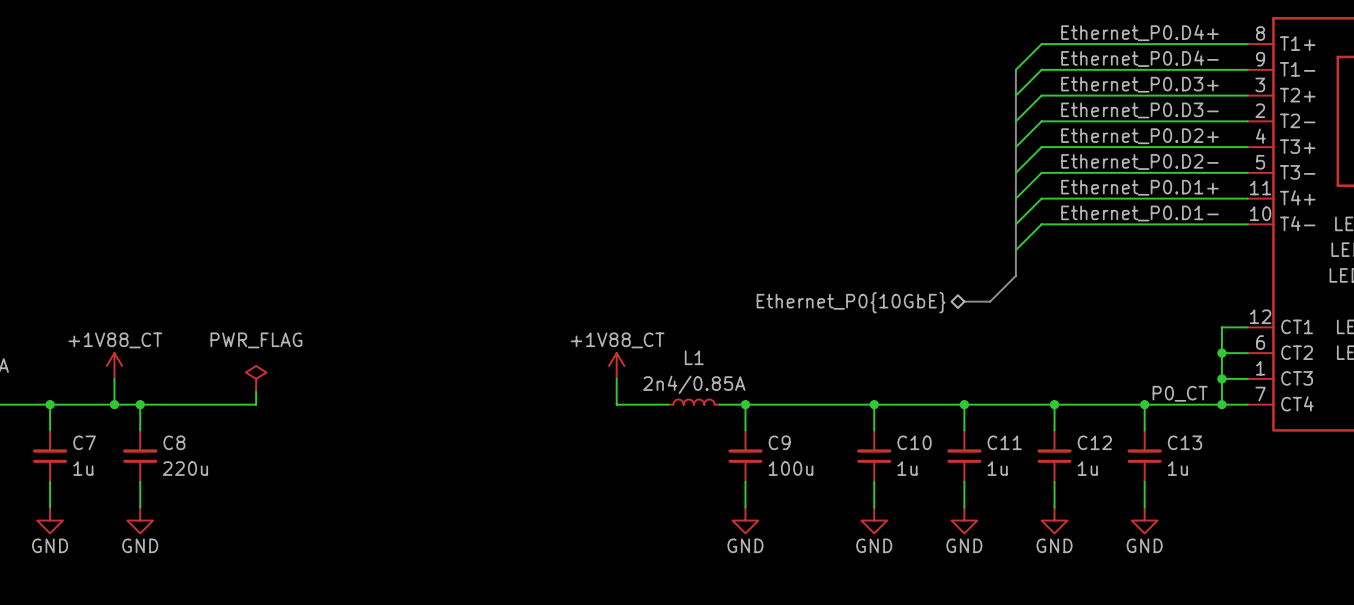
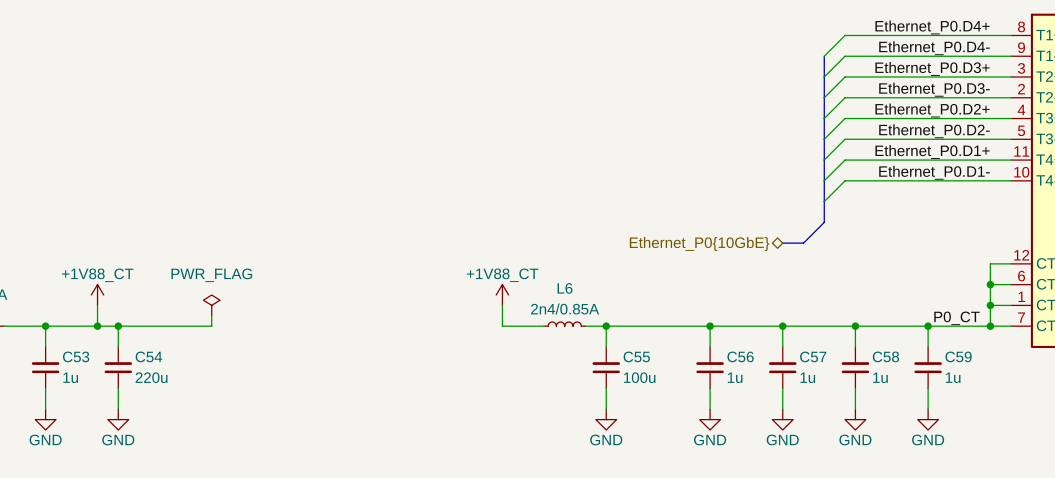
L1 name: L1 (694, 357) -> L6 (565, 288)
C7 name: C7 (84, 442) -> C53 (76, 356)
C8 name: C8 (174, 442) -> C54 (148, 356)
C9 name: C9 (779, 442) -> C55 (636, 356)
C10 name: C10 (914, 442) -> C56 (740, 356)
C11 name: C11 (1004, 442) -> C57 (813, 356)
C12 name: C12 (1094, 442) -> C58 (885, 356)
C13 name: C13 (1184, 442) -> C59 (958, 356)

